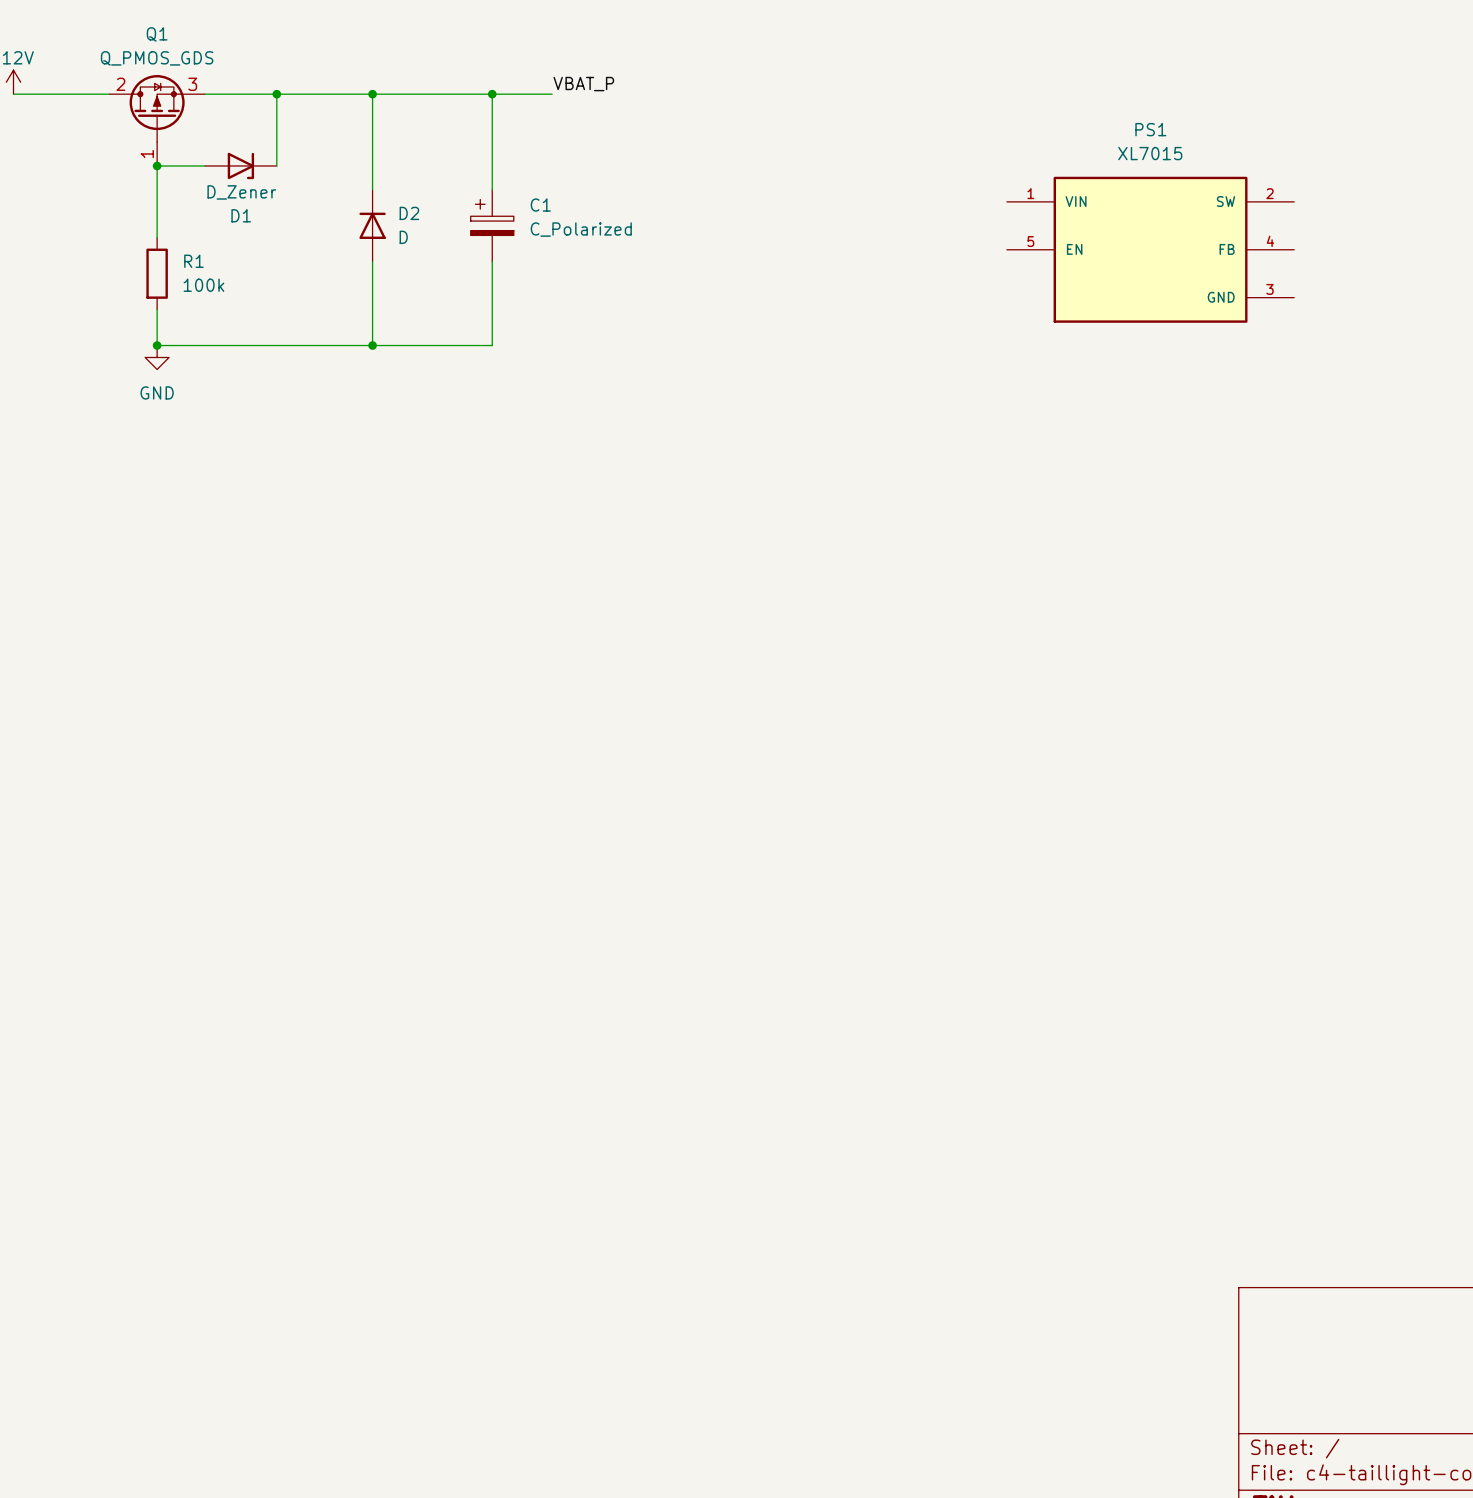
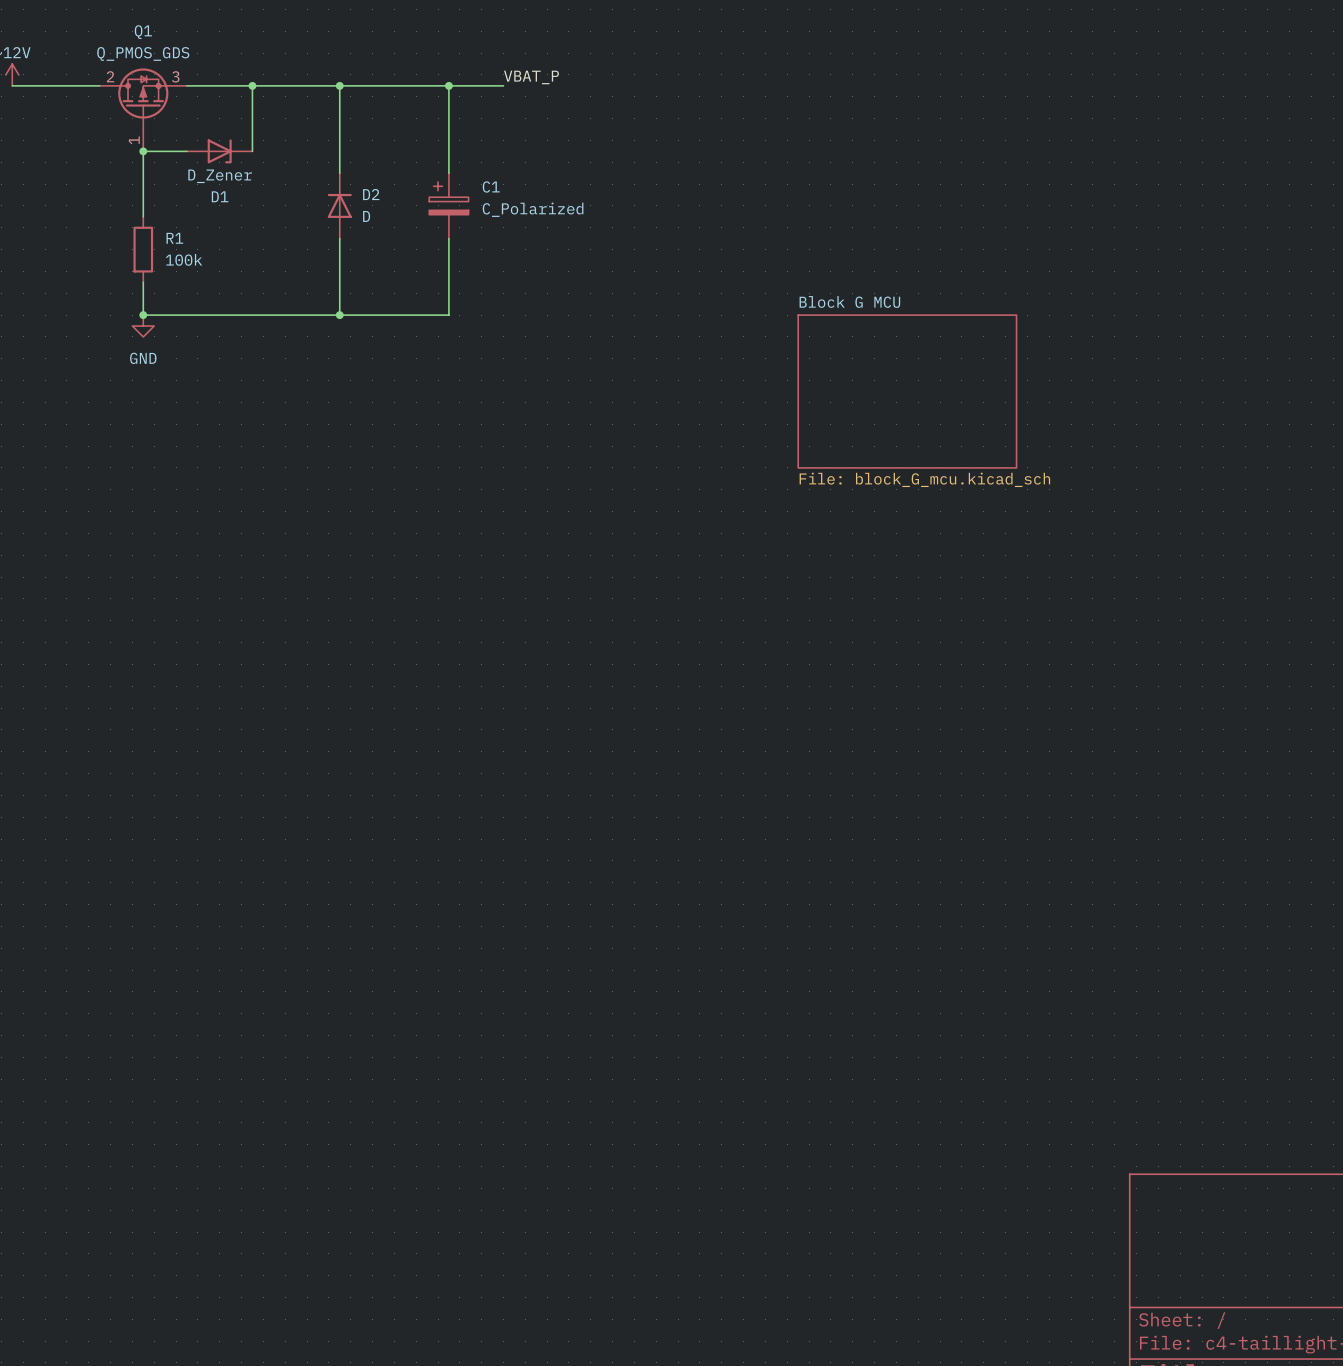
PS1: XL7015 (1150, 249) -> none
sheet Block G MCU: none -> File: block_G_mcu.kicad_sch (907, 391)

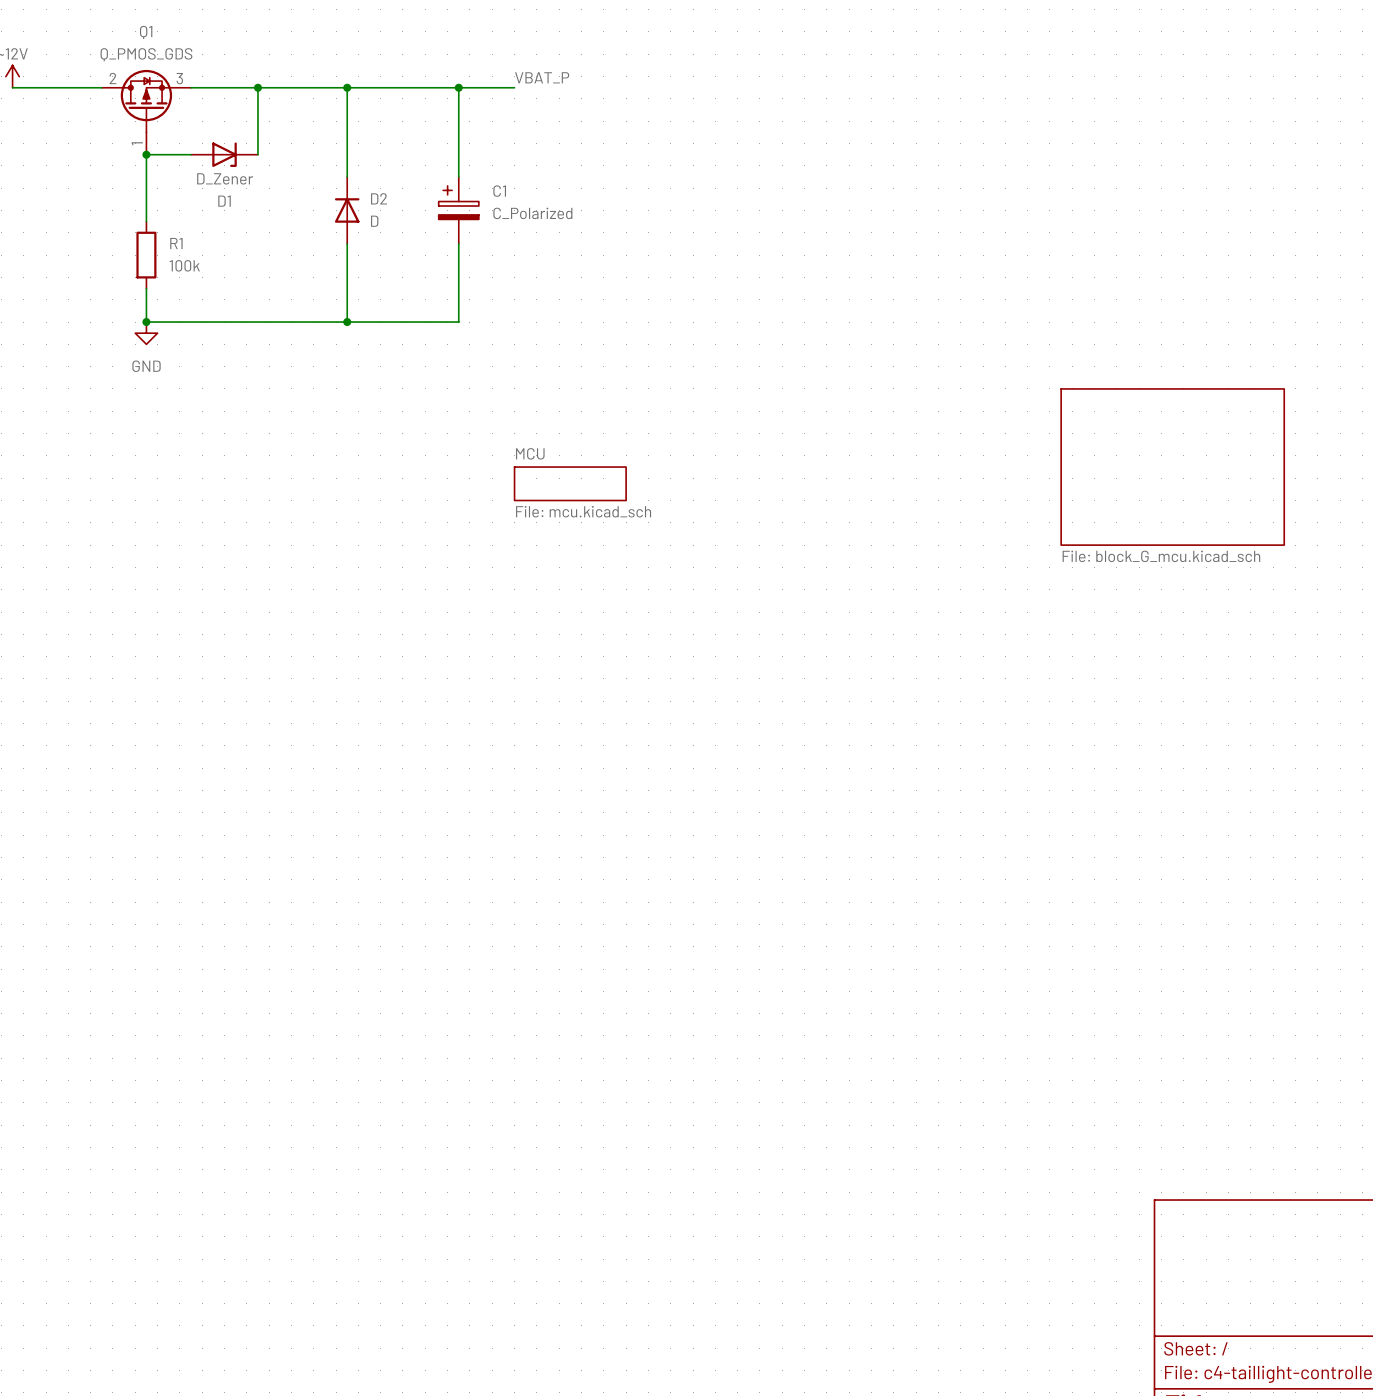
sheet Block G MCU: File: block_G_mcu.kicad_sch (907, 391) -> none
sheet: none -> File: block_G_mcu.kicad_sch (1172, 467)
sheet MCU: none -> File: mcu.kicad_sch (570, 483)

